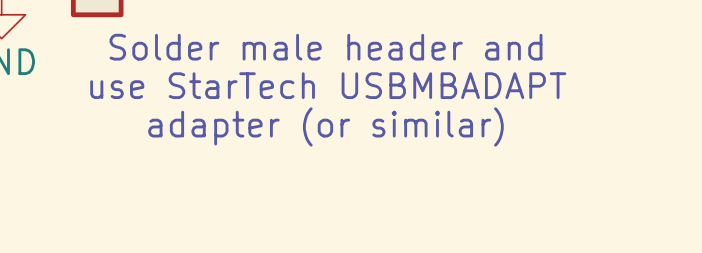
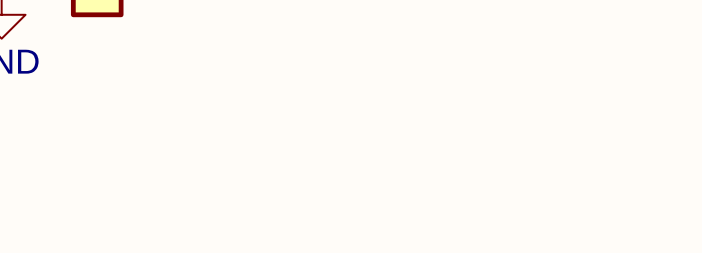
text: Solder male header and (326, 47) -> none
text: use StarTech USBMBADAPT (328, 85) -> none
text: adapter (or similar) (326, 126) -> none

